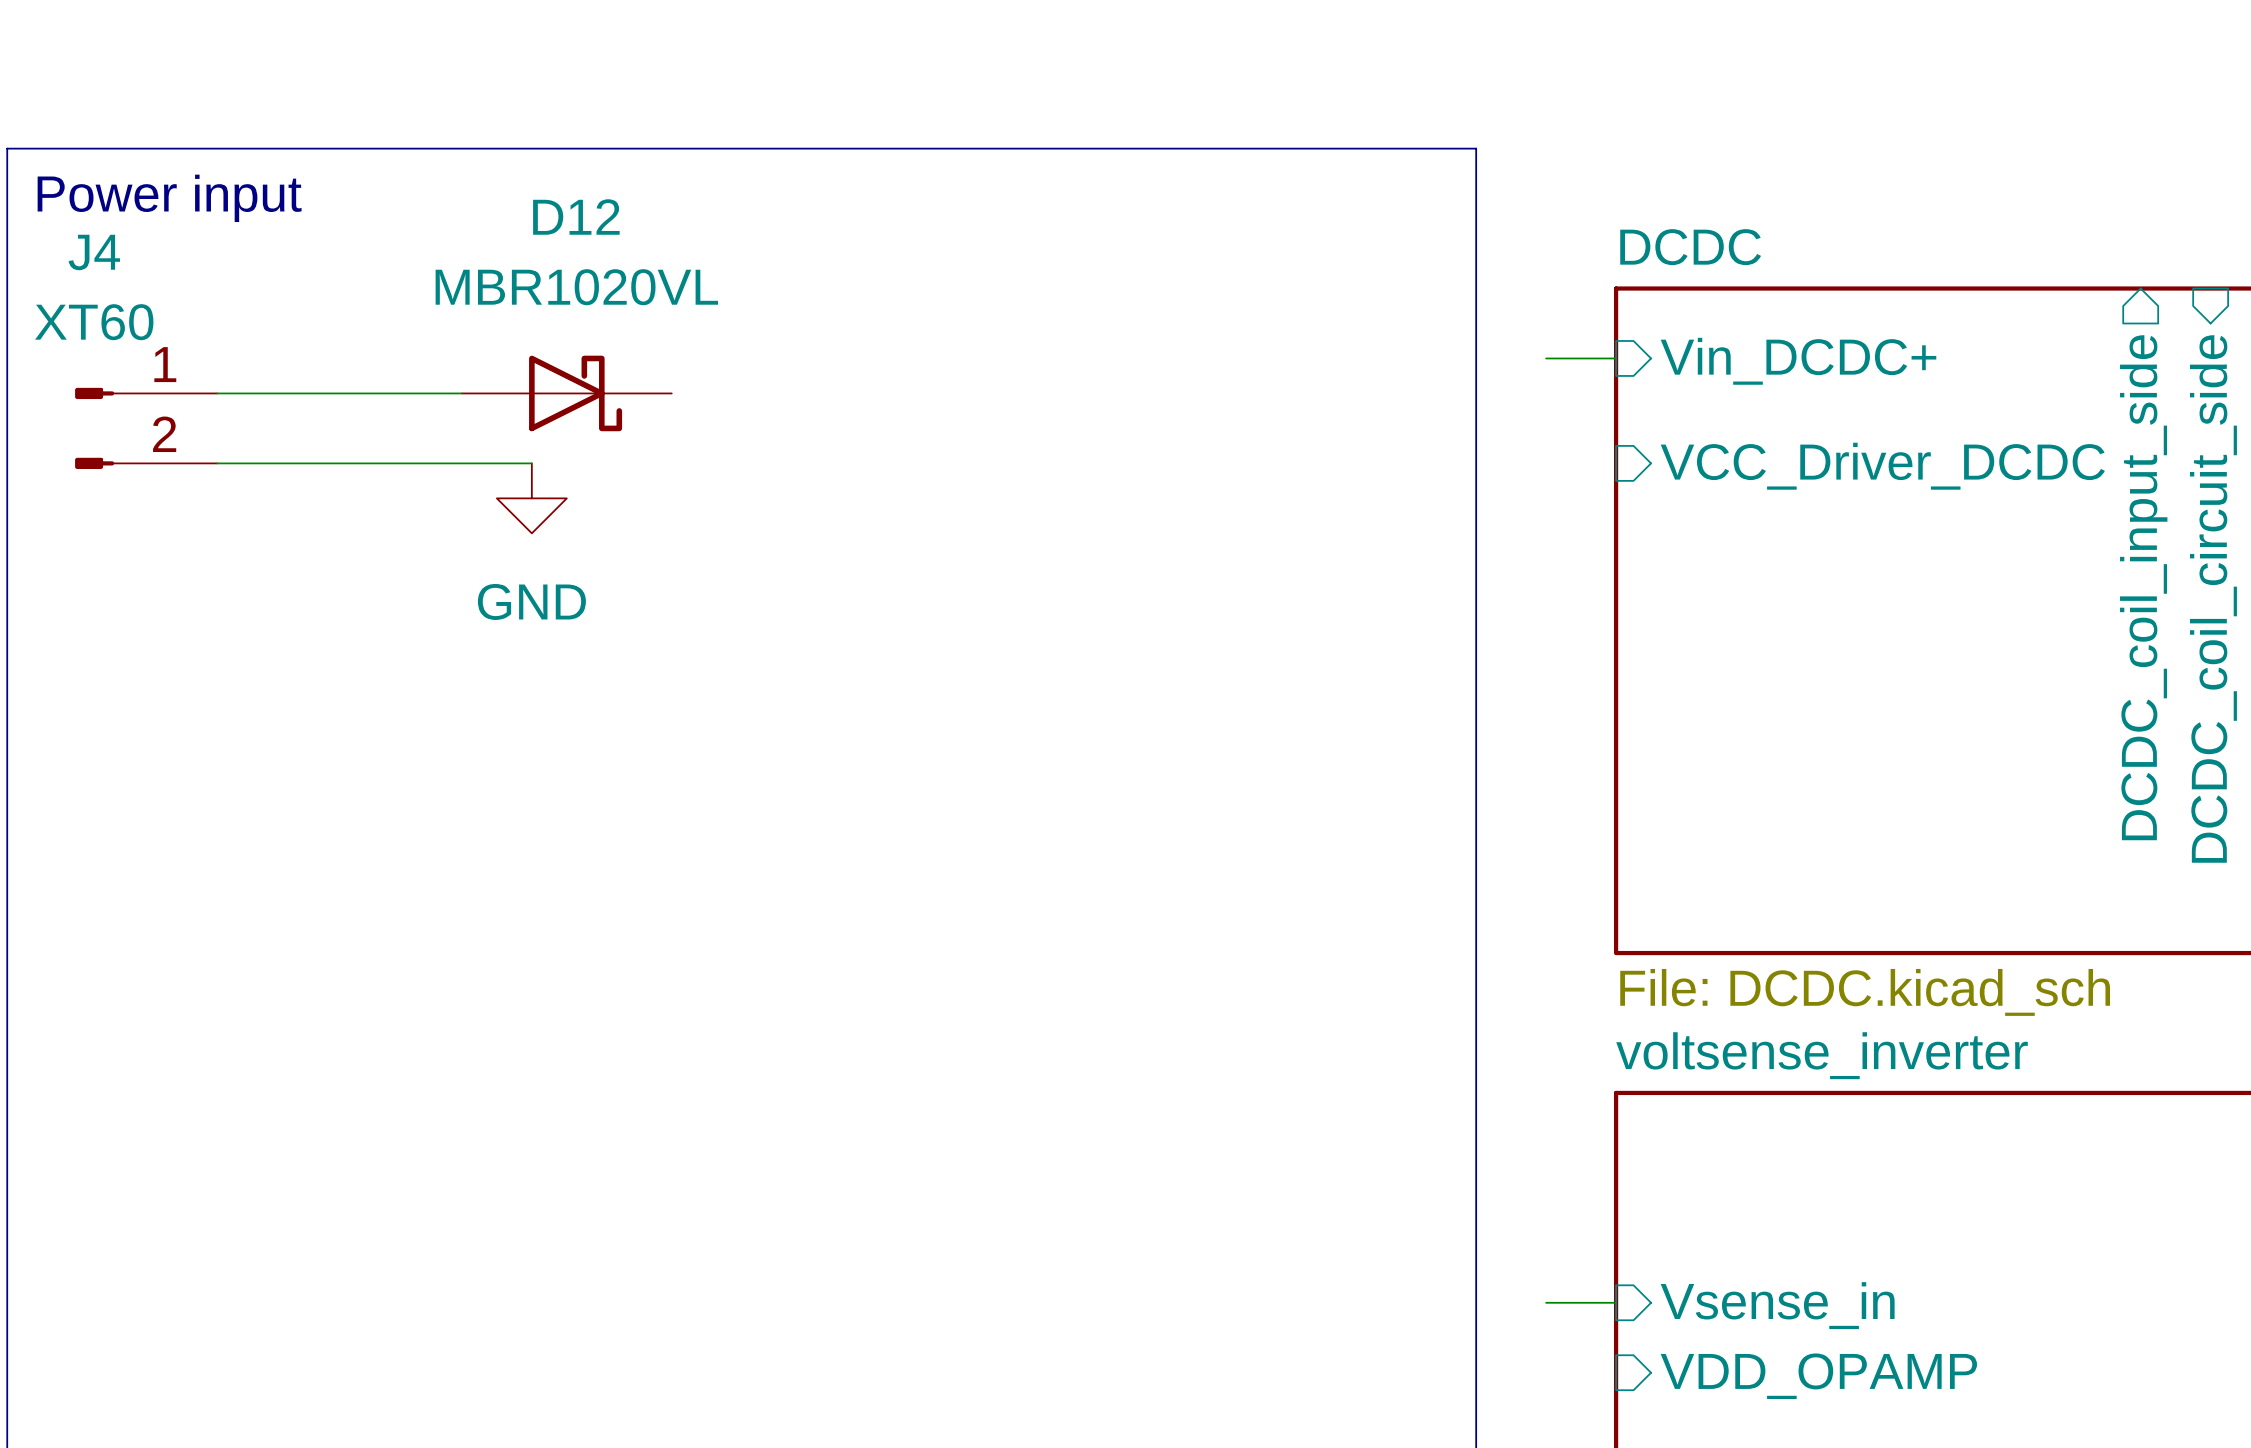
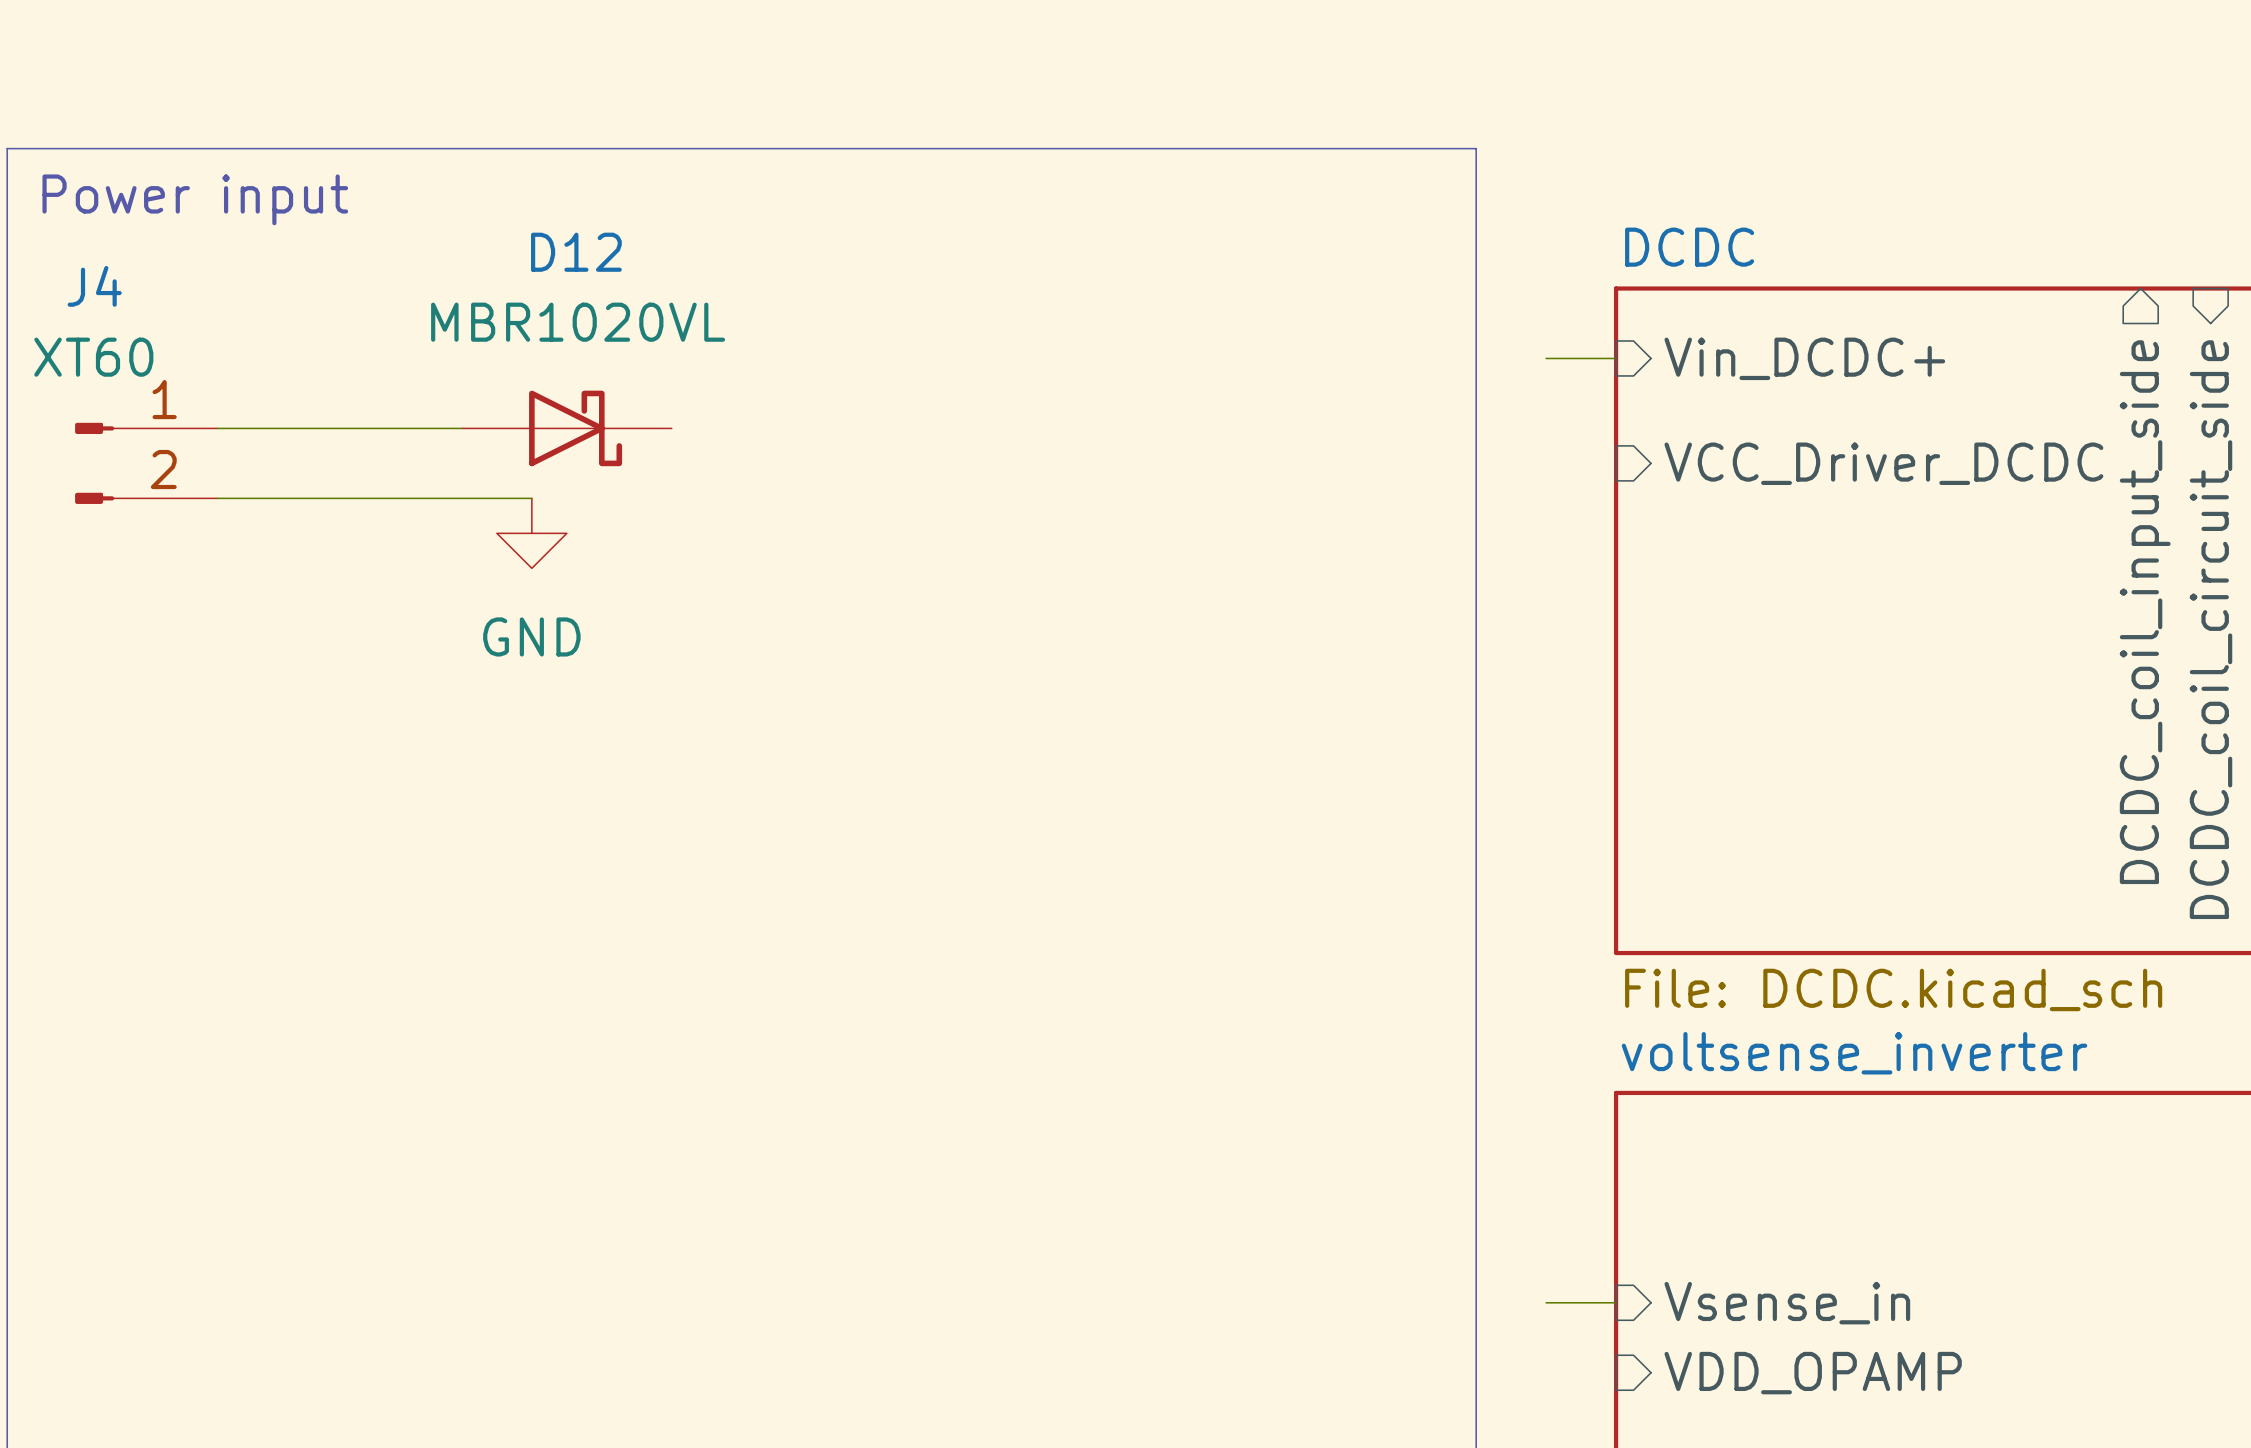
wire: (217, 393) (461, 393) -> (217, 428) (461, 428)
D12 position: (566, 393) -> (566, 428)
J4 position: (146, 428) -> (146, 463)
wire: (217, 463) (531, 463) -> (217, 498) (531, 498)
power symbol position: GND (531, 498) -> GND (531, 533)

